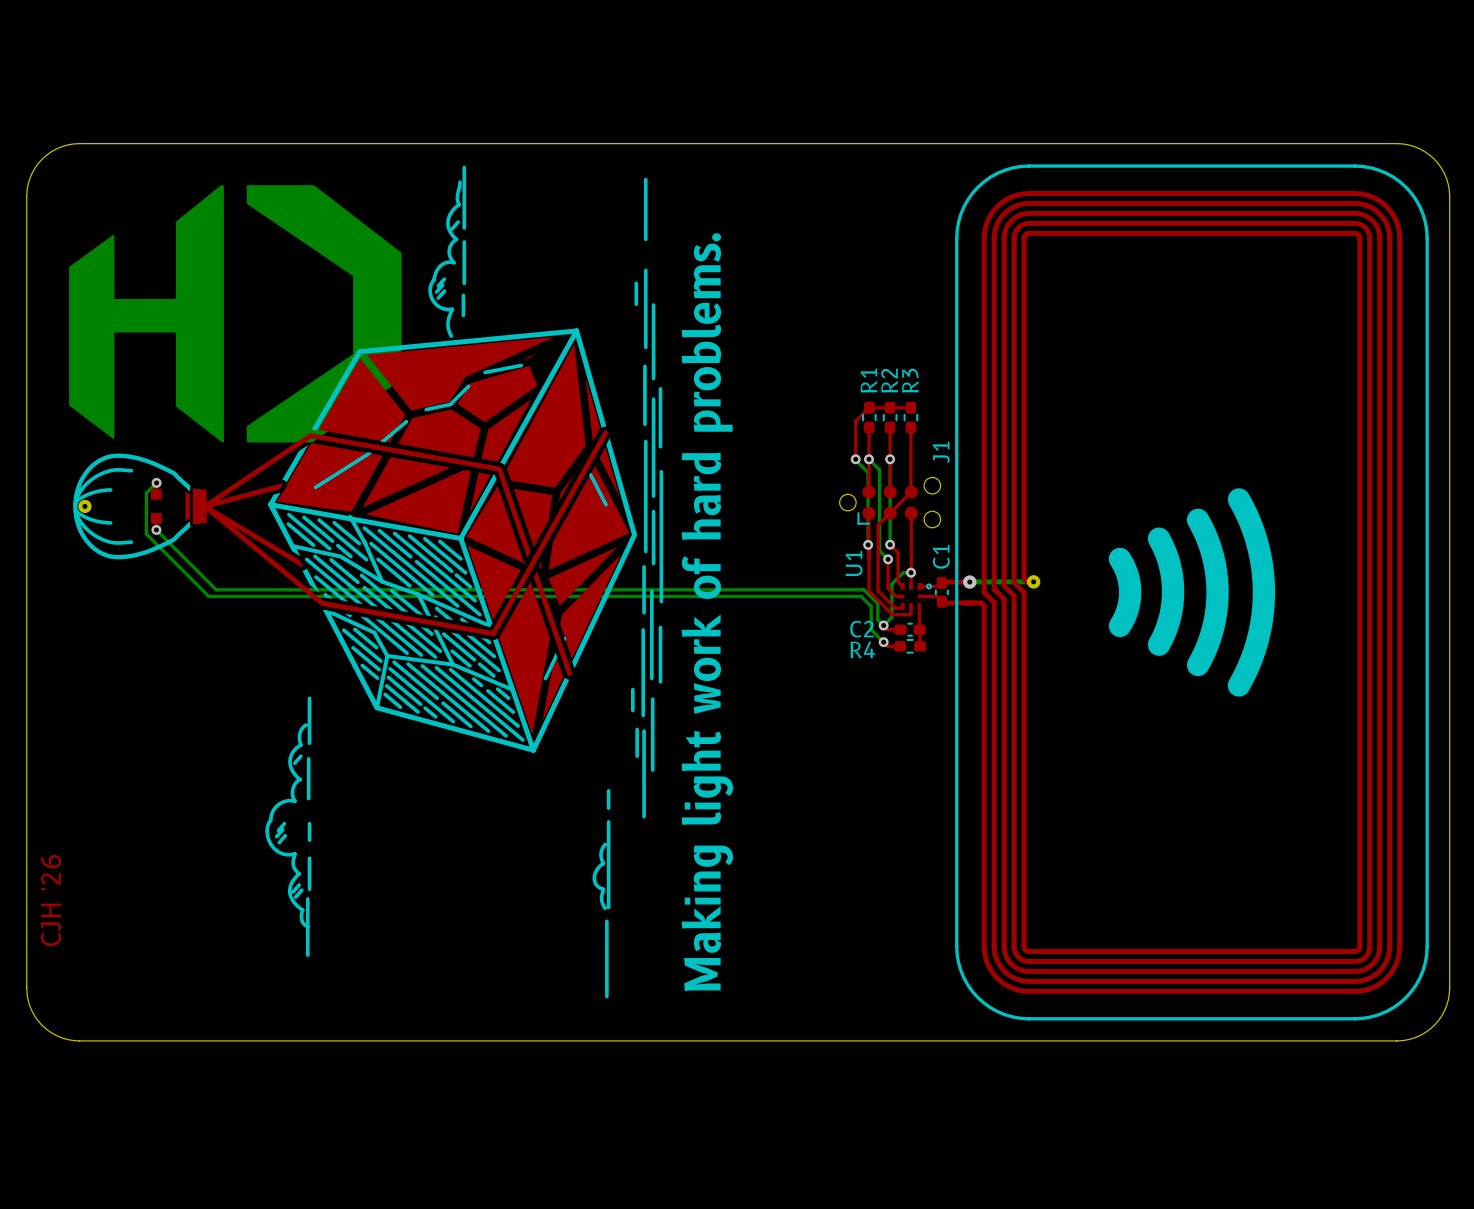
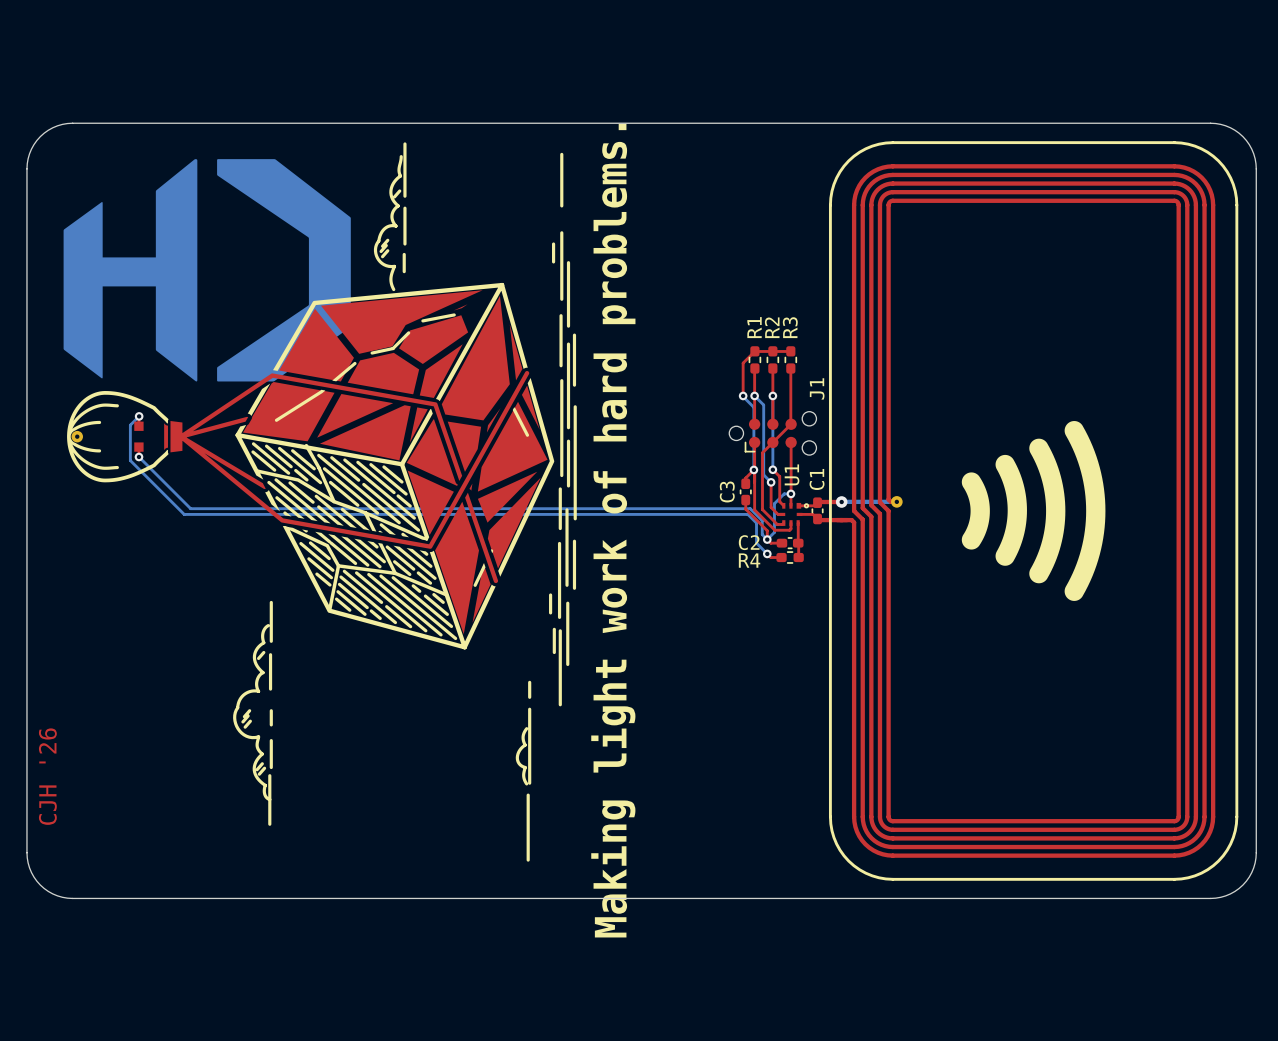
top track: none -> (753, 469) (745, 478) (745, 483)
U1 name position: U1 (854, 563) -> U1 (792, 474)
C3: none -> (745, 491)
top track: none -> (745, 500) (745, 509) (767, 530) (767, 539)

